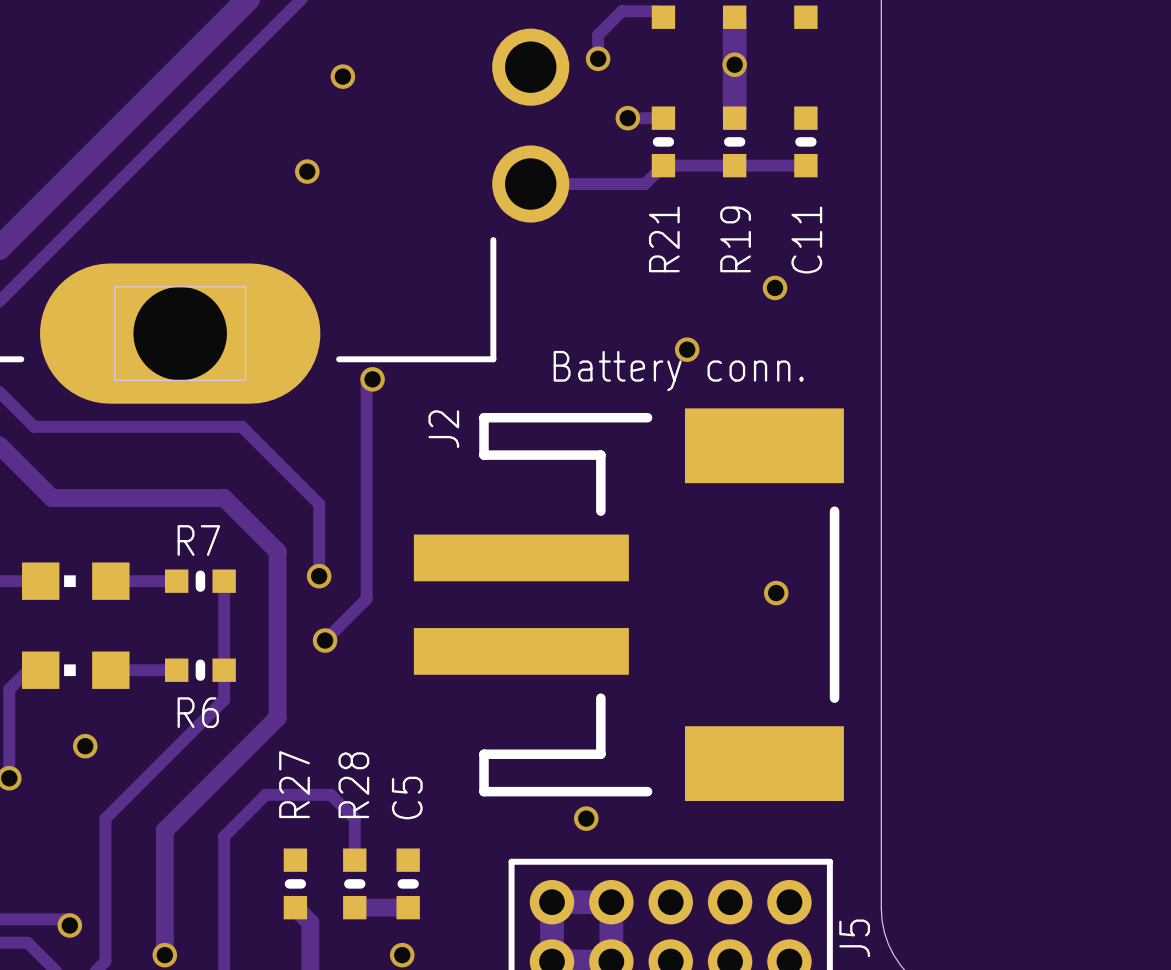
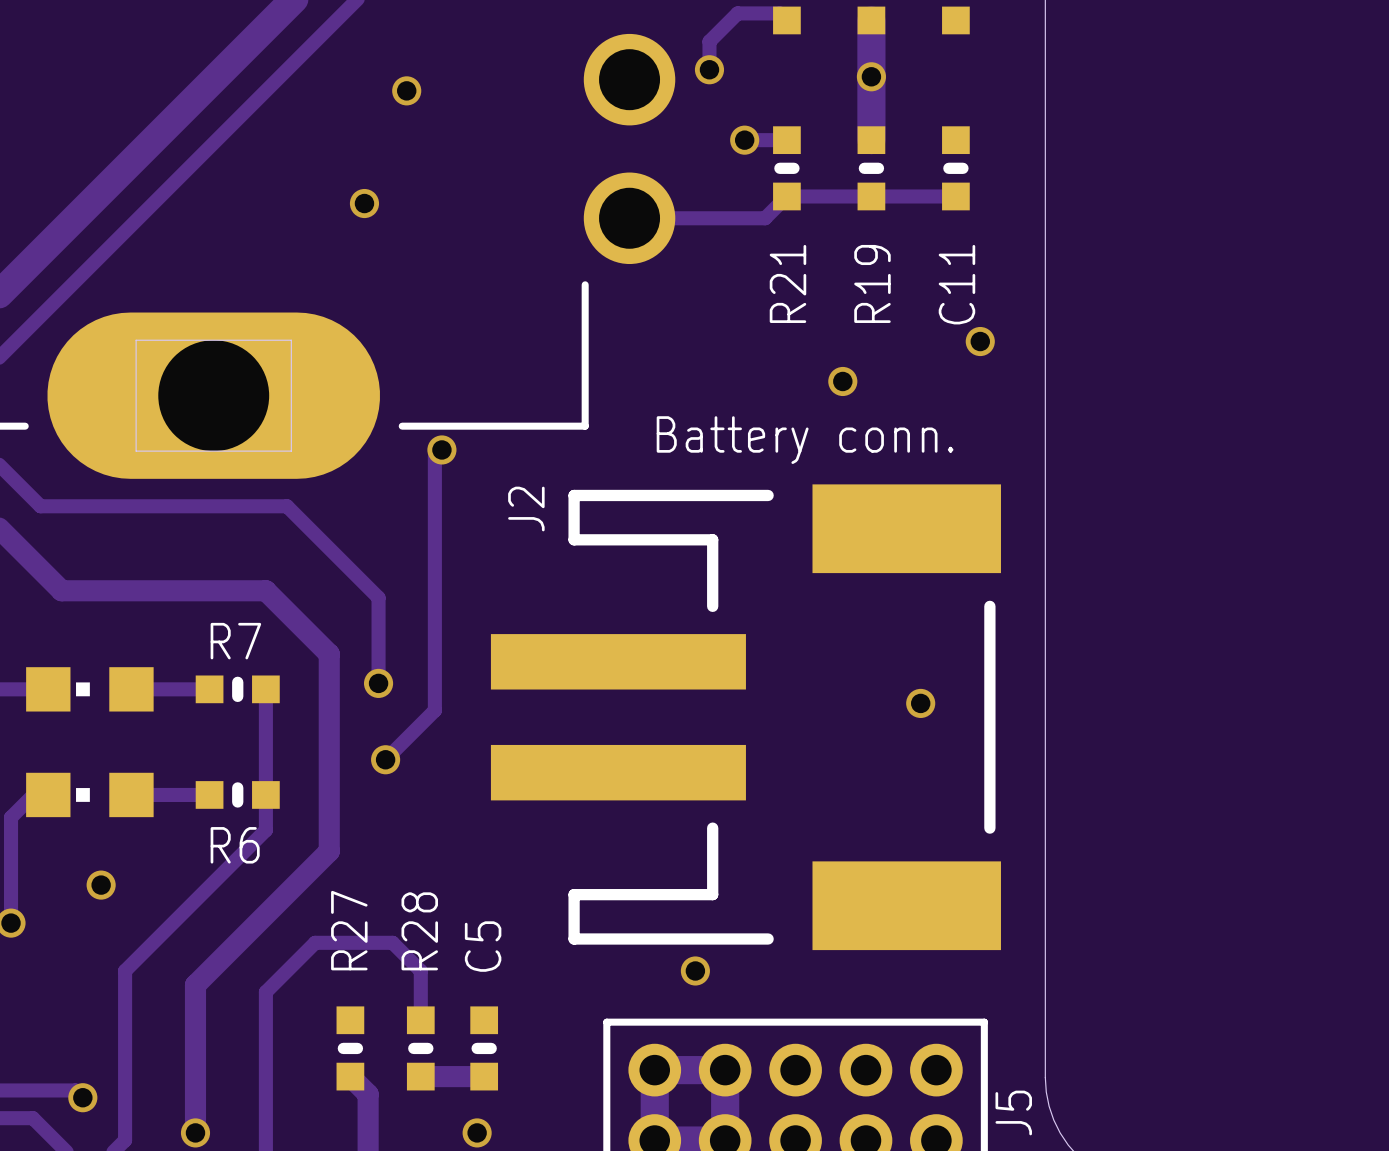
via: (775, 287) -> none
via: none -> (980, 341)
via: none -> (842, 381)
via: (687, 349) -> none

